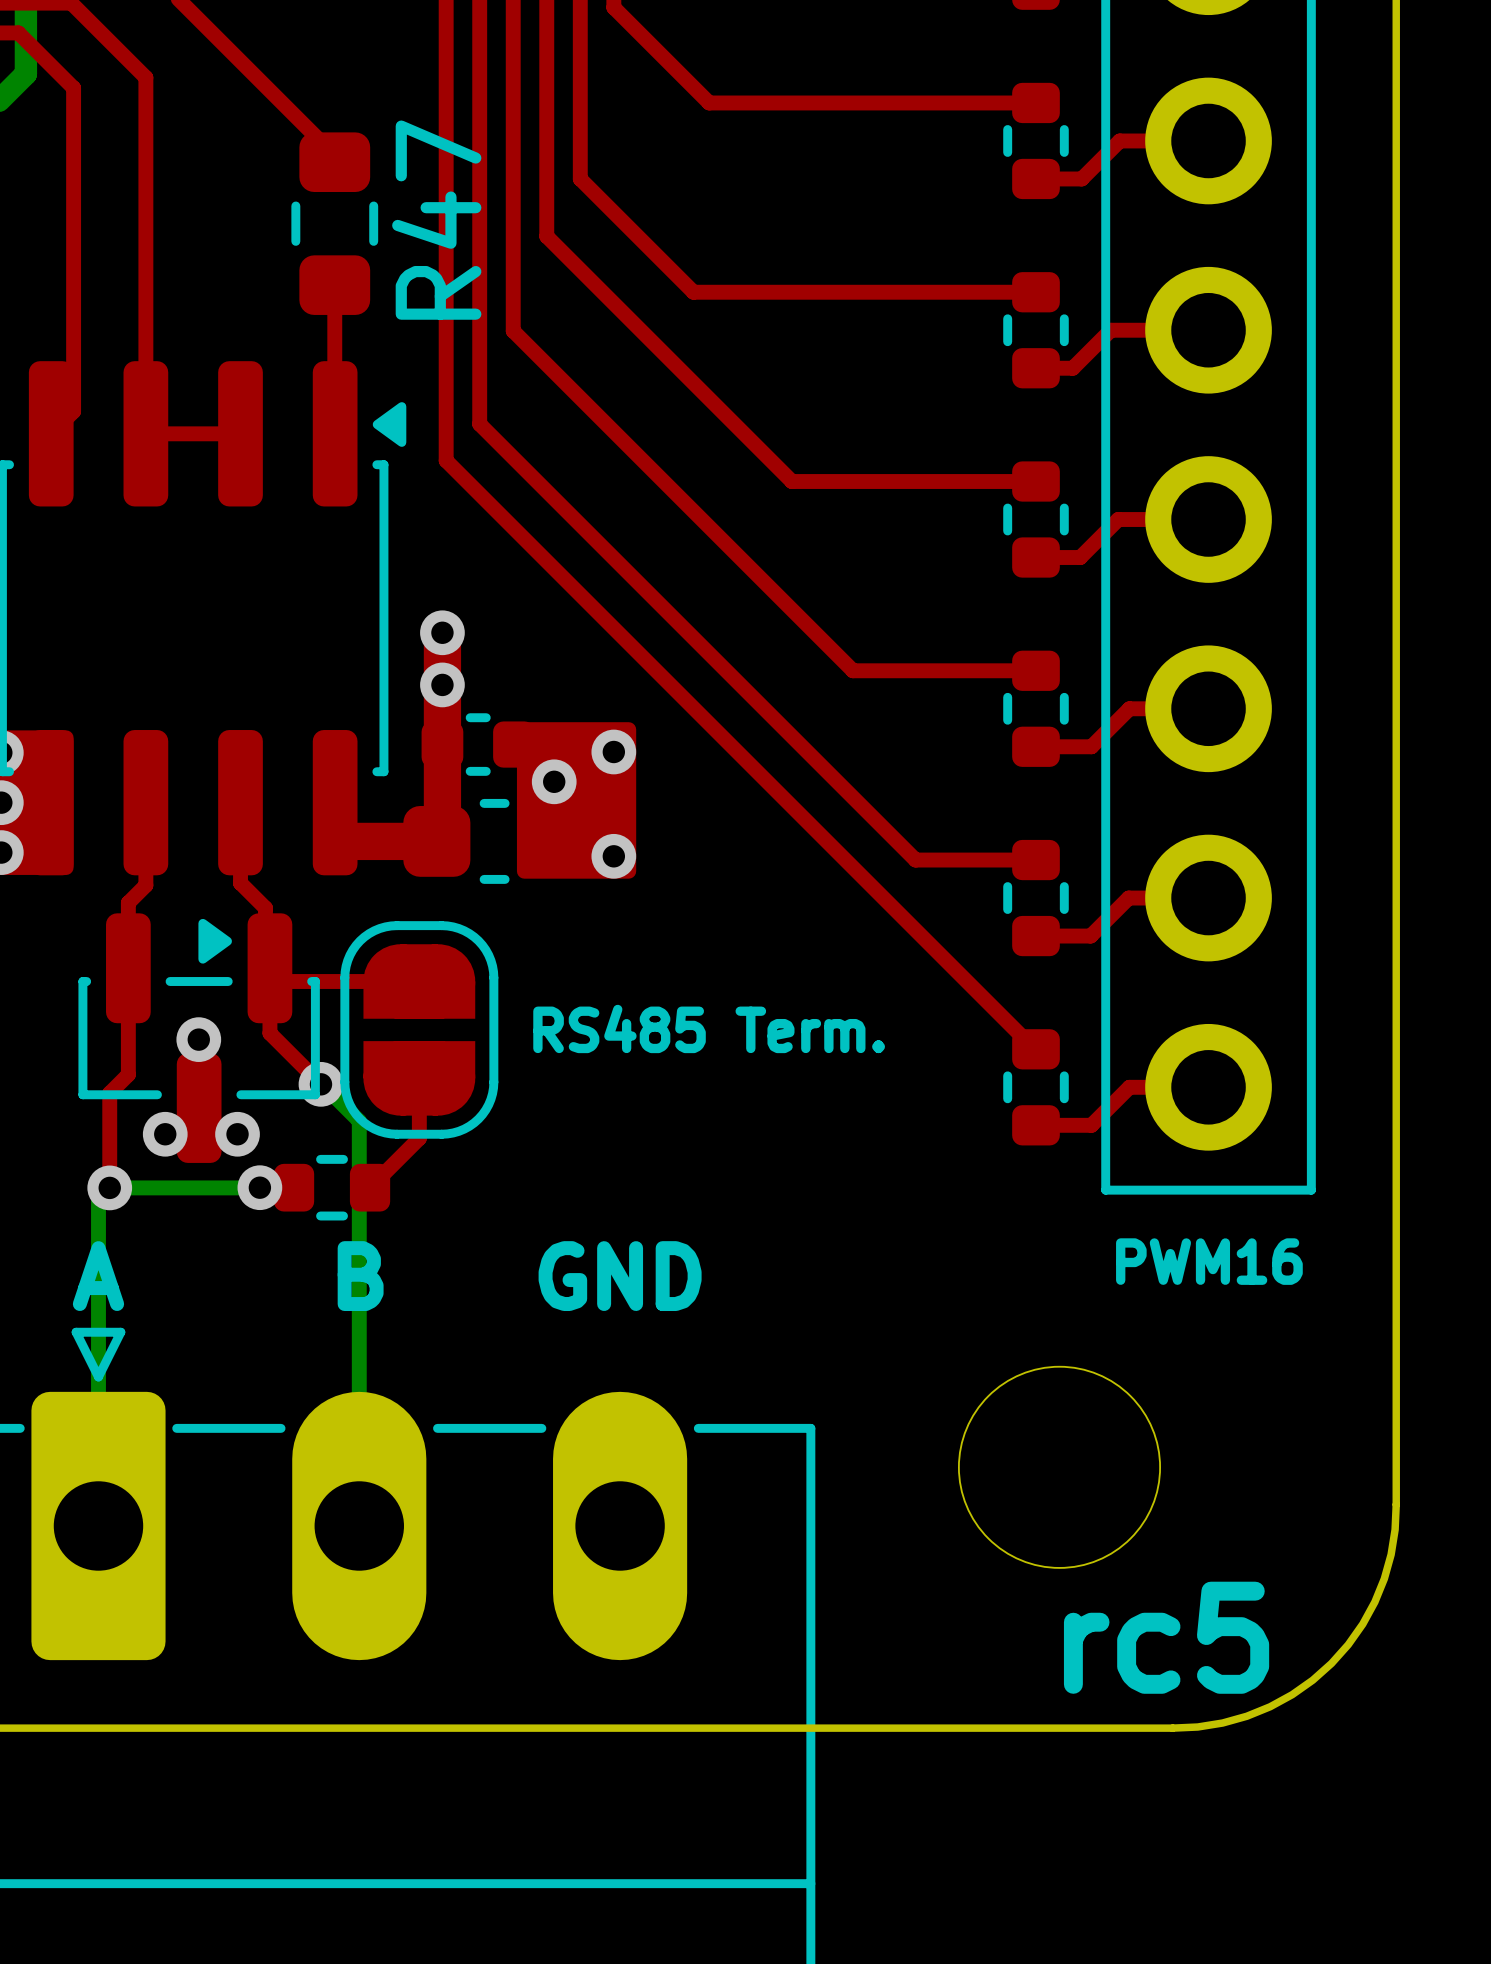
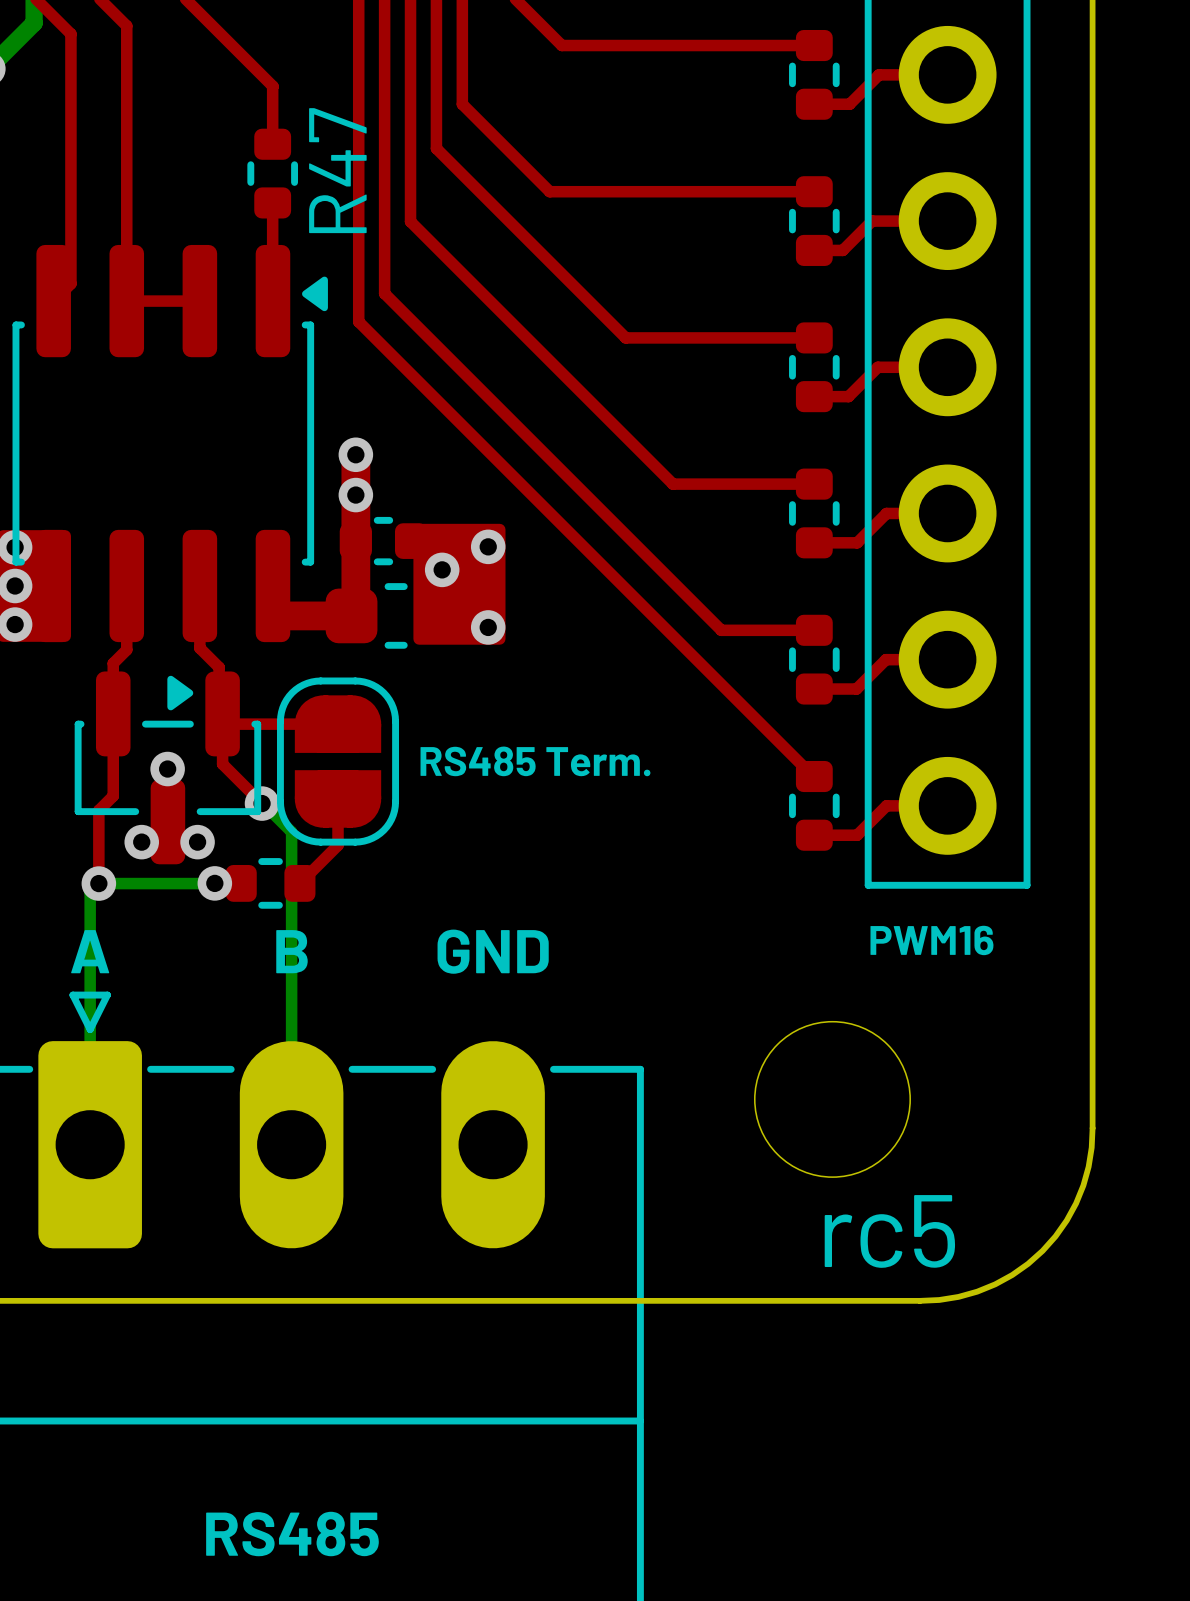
R47 footprint: [291, 132, 379, 315] -> [247, 128, 299, 219]
top track: none -> (272, 91) (272, 148)
R47 name position: R47 (436, 220) -> R47 (337, 170)

